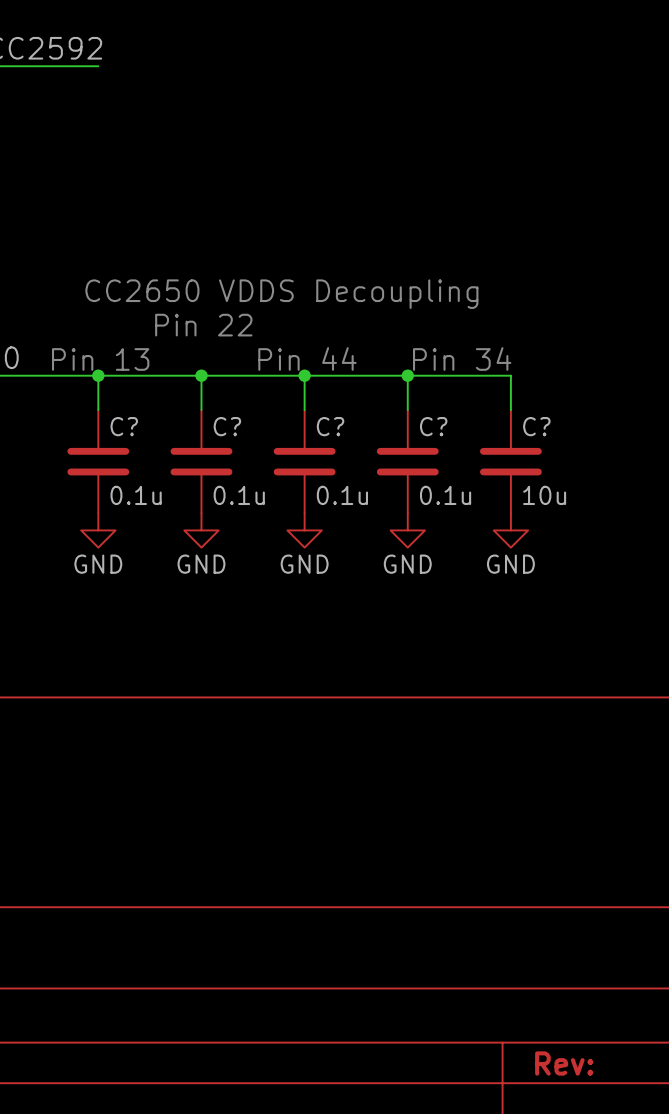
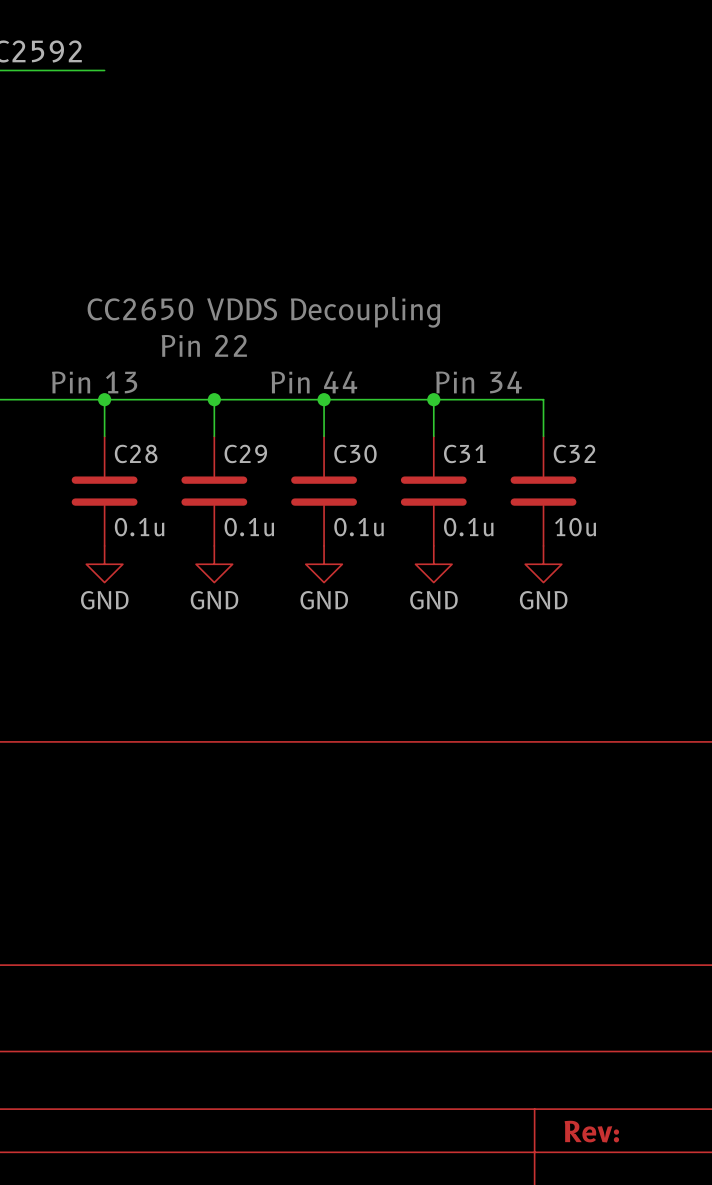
C? name: C? (124, 426) -> C28 (136, 453)
C? name: C? (227, 426) -> C29 (245, 453)
C? name: C? (330, 426) -> C30 (355, 453)
C? name: C? (433, 426) -> C31 (464, 453)
C? name: C? (536, 426) -> C32 (574, 453)

